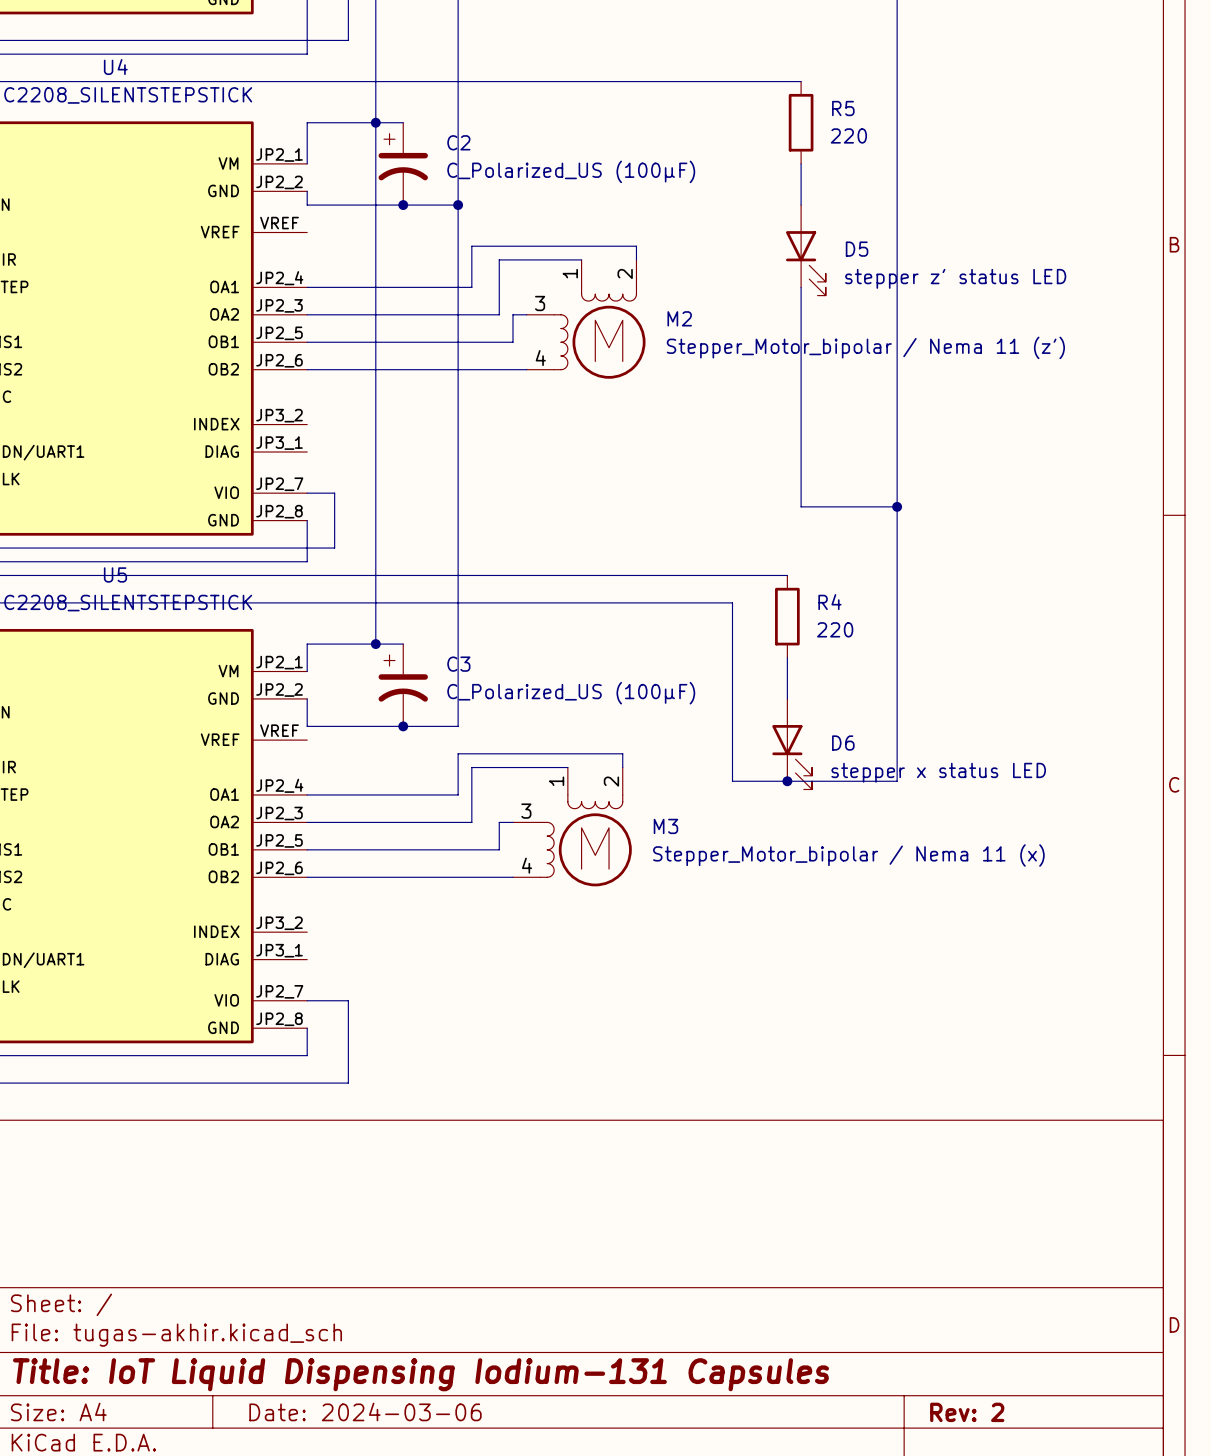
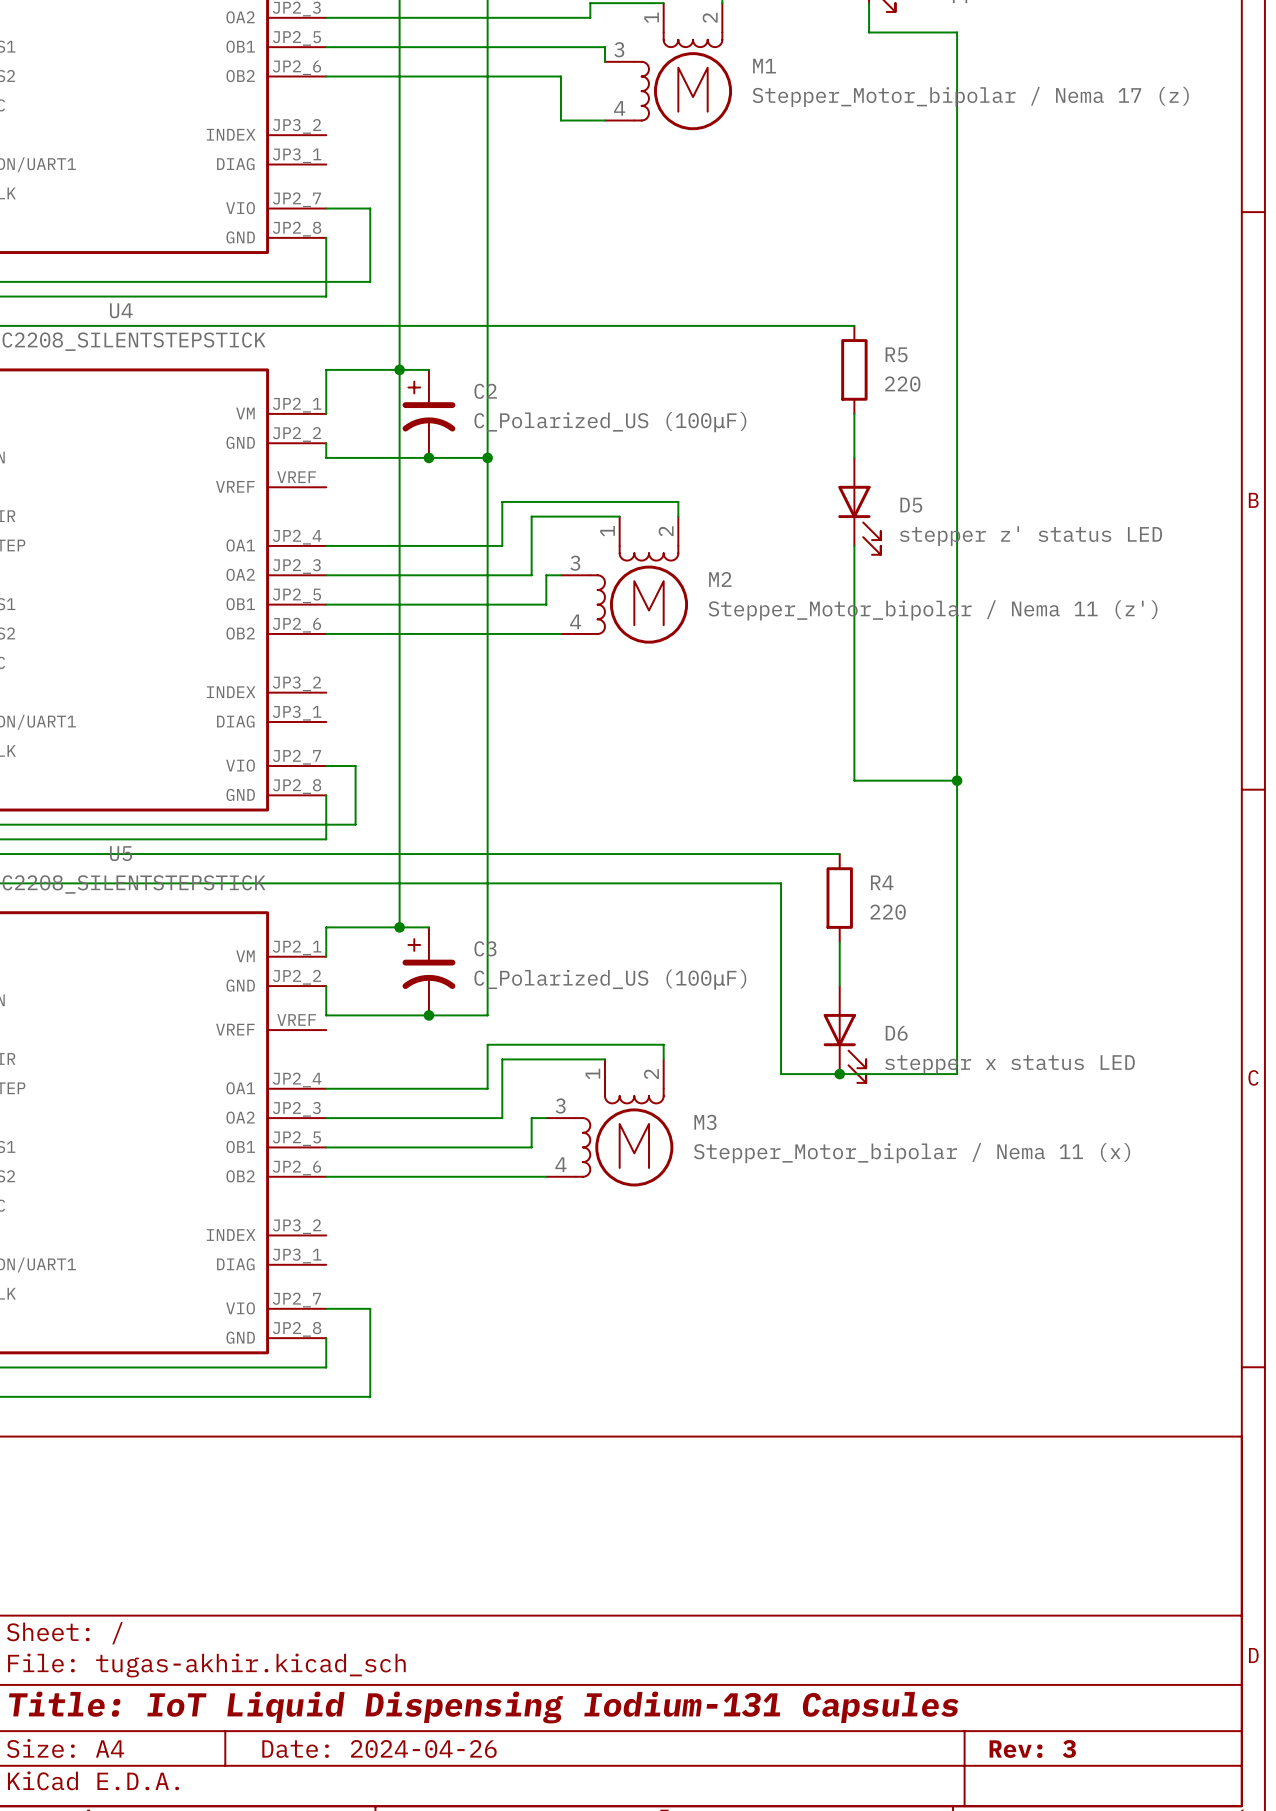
title block: Date: 2024-03-06 (365, 1411) -> Date: 2024-04-26 (379, 1748)
title block: Rev: 2 (967, 1412) -> Rev: 3 (1032, 1748)

